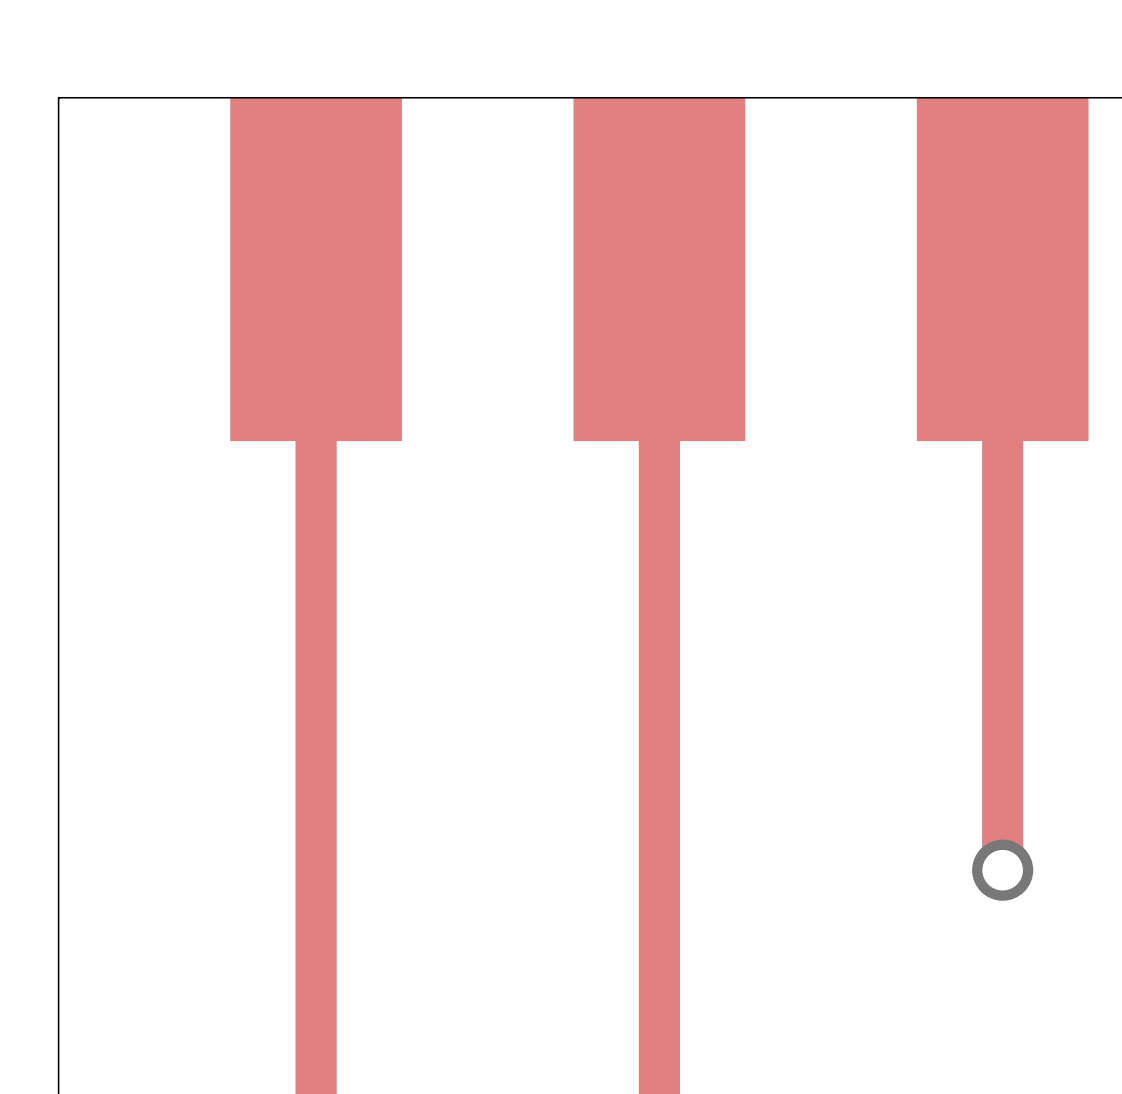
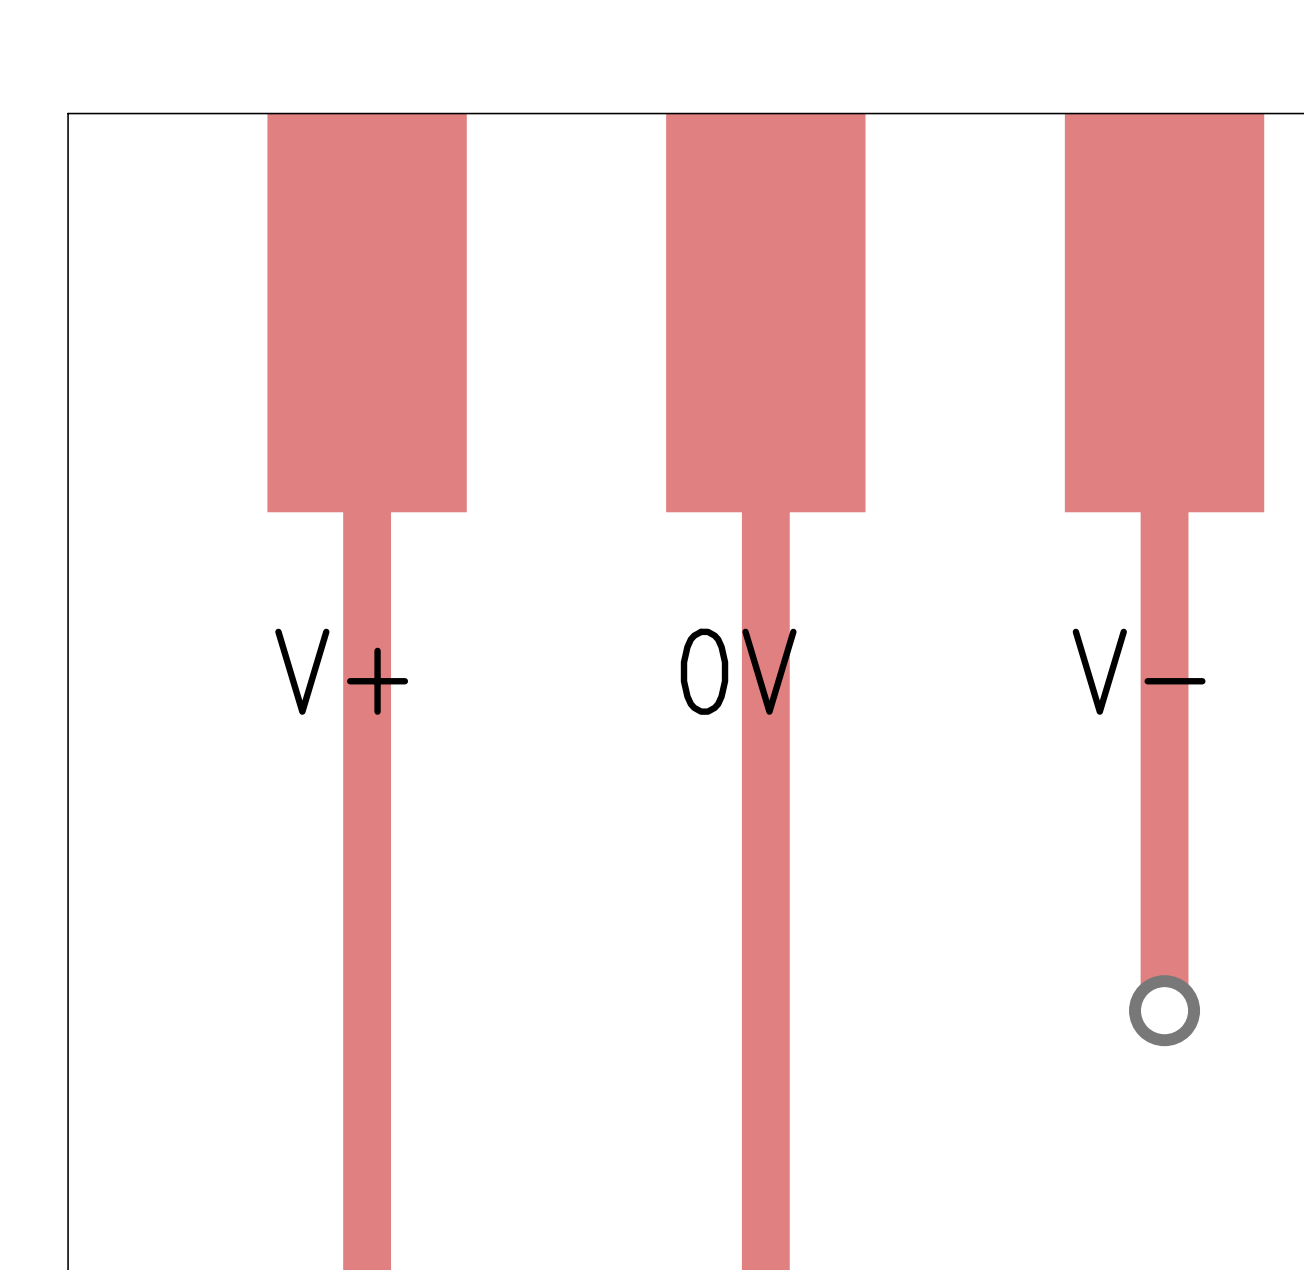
text: none -> V+ (341, 671)
text: none -> 0V (738, 671)
text: none -> V- (1139, 671)

